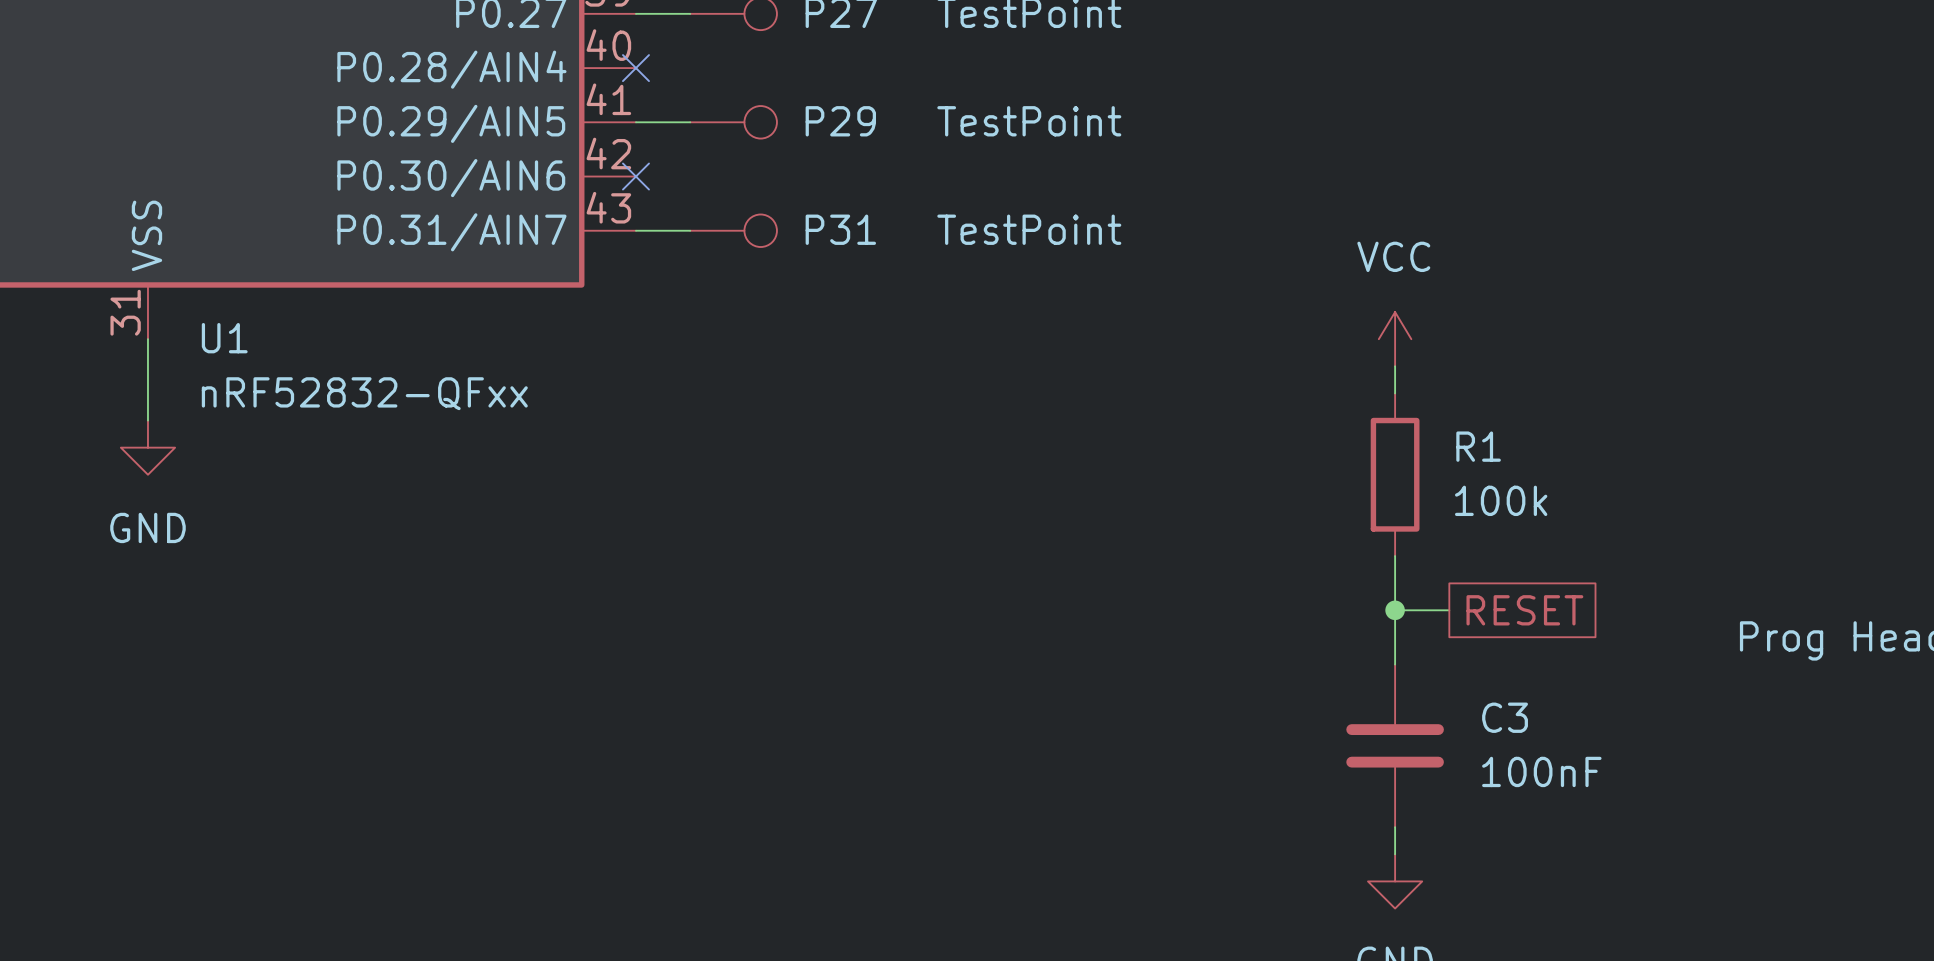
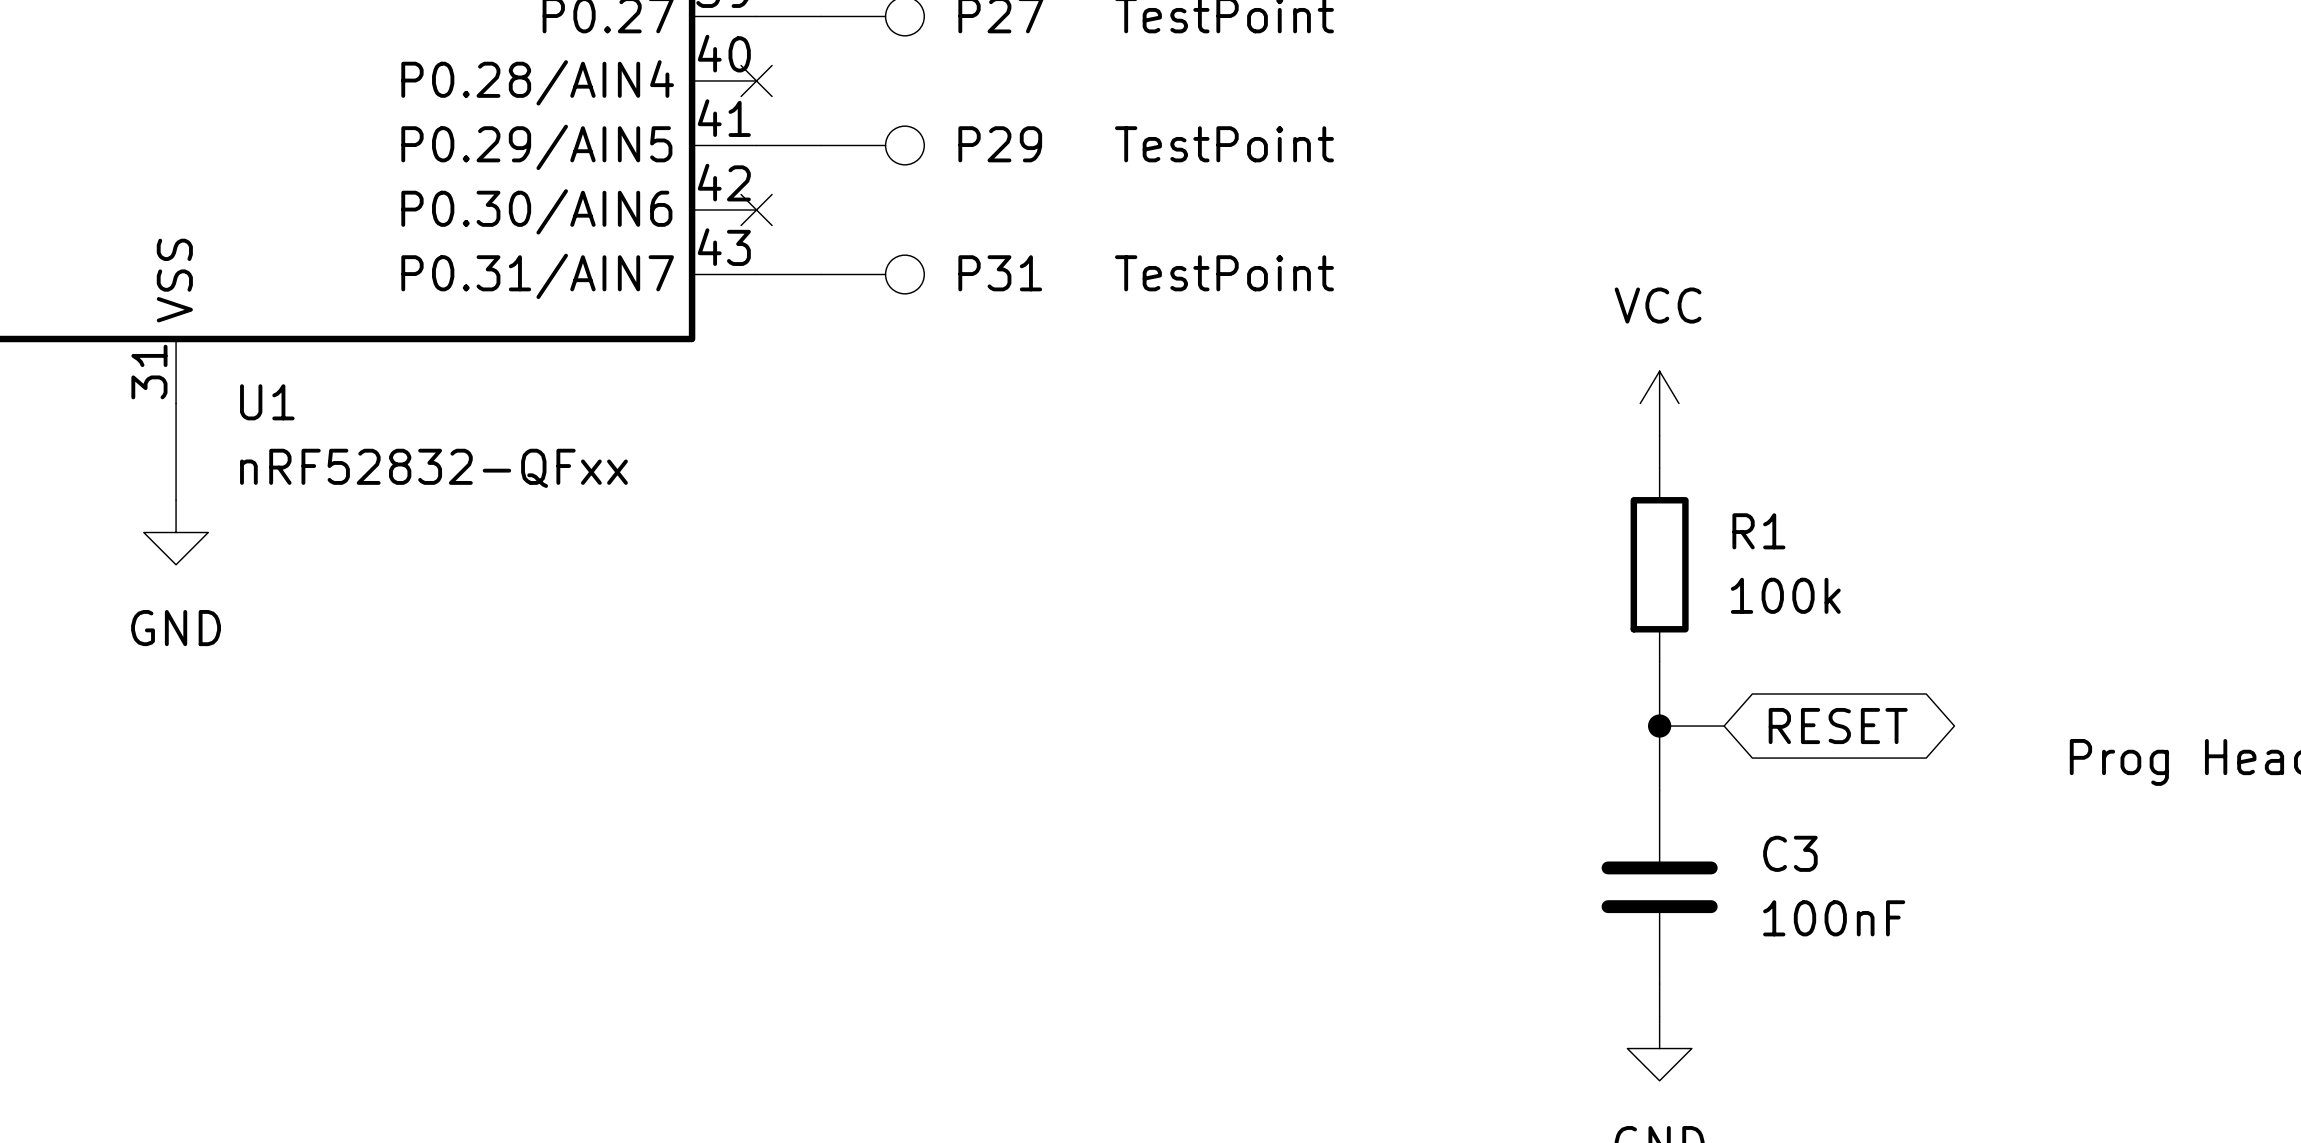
global label shape: passive (1524, 610) -> bidirectional (1838, 726)

